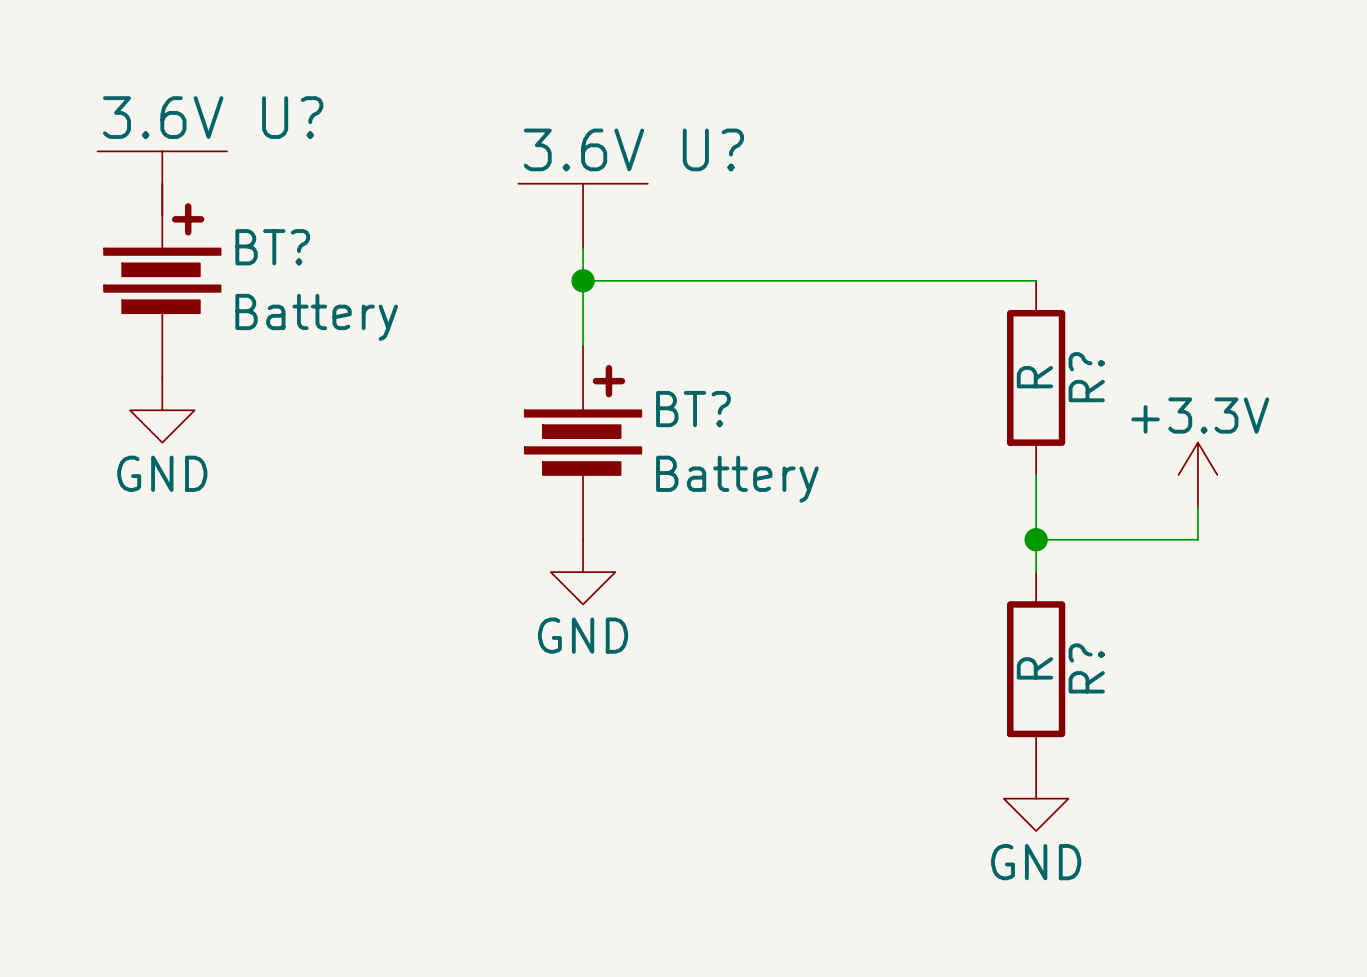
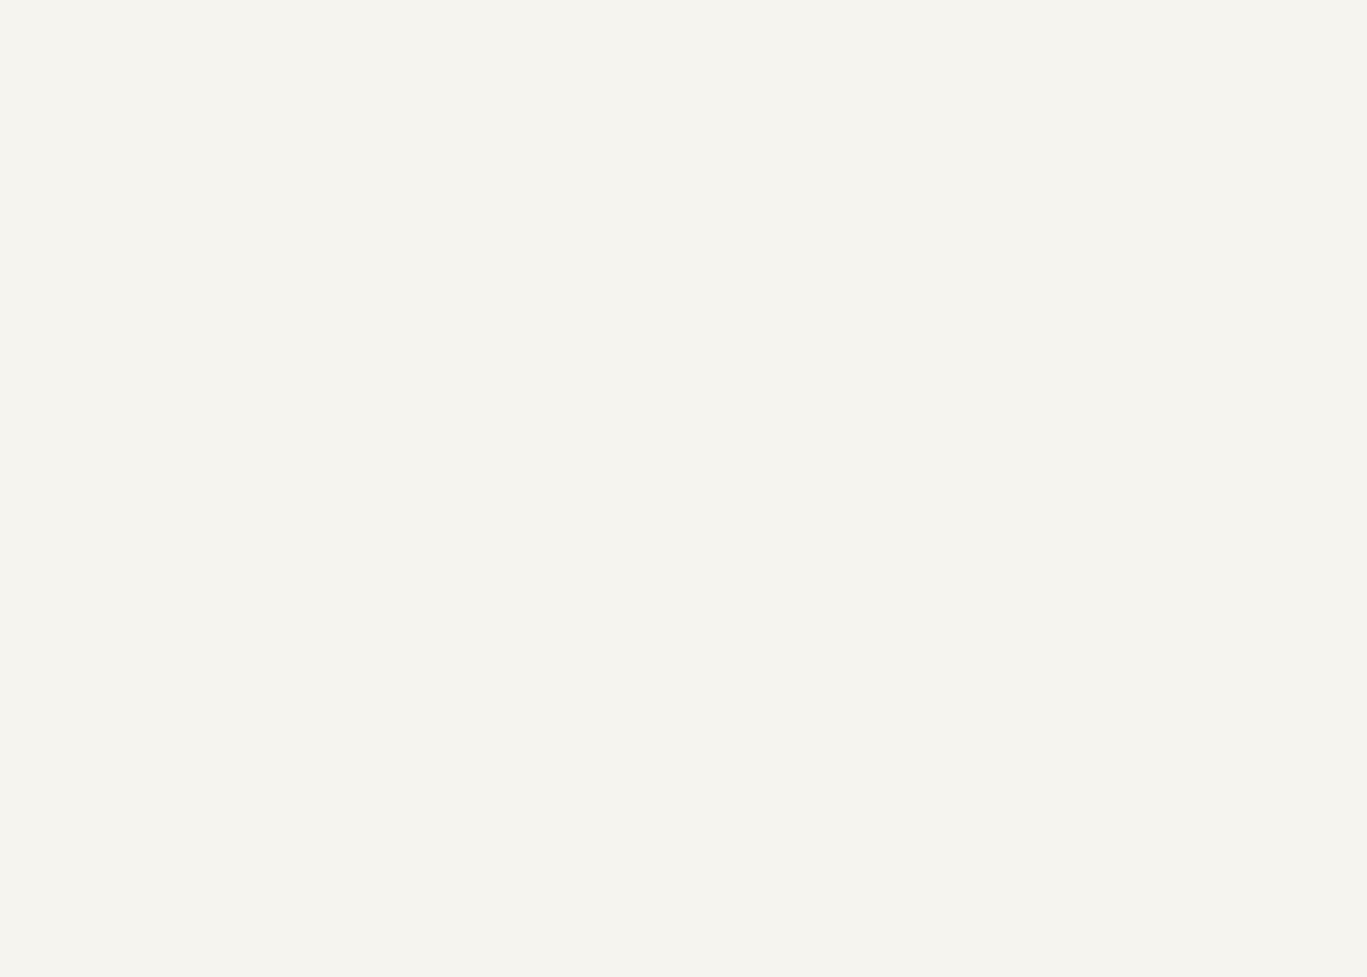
U?: 3.6V (162, 183) -> none
U?: 3.6V (583, 216) -> none
wire: (583, 248) (583, 345) -> none
BT?: Battery (162, 280) -> none
wire: (583, 280) (1036, 280) -> none
junction: (583, 280) -> none
R?: R (1036, 377) -> none
power symbol: GND (162, 410) -> none
BT?: Battery (583, 442) -> none
wire: (1036, 475) (1036, 572) -> none
power symbol: +3.3V (1197, 475) -> none
wire: (1197, 507) (1197, 539) (1036, 539) -> none
junction: (1036, 539) -> none
power symbol: GND (583, 572) -> none
R?: R (1036, 669) -> none
power symbol: GND (1036, 798) -> none

